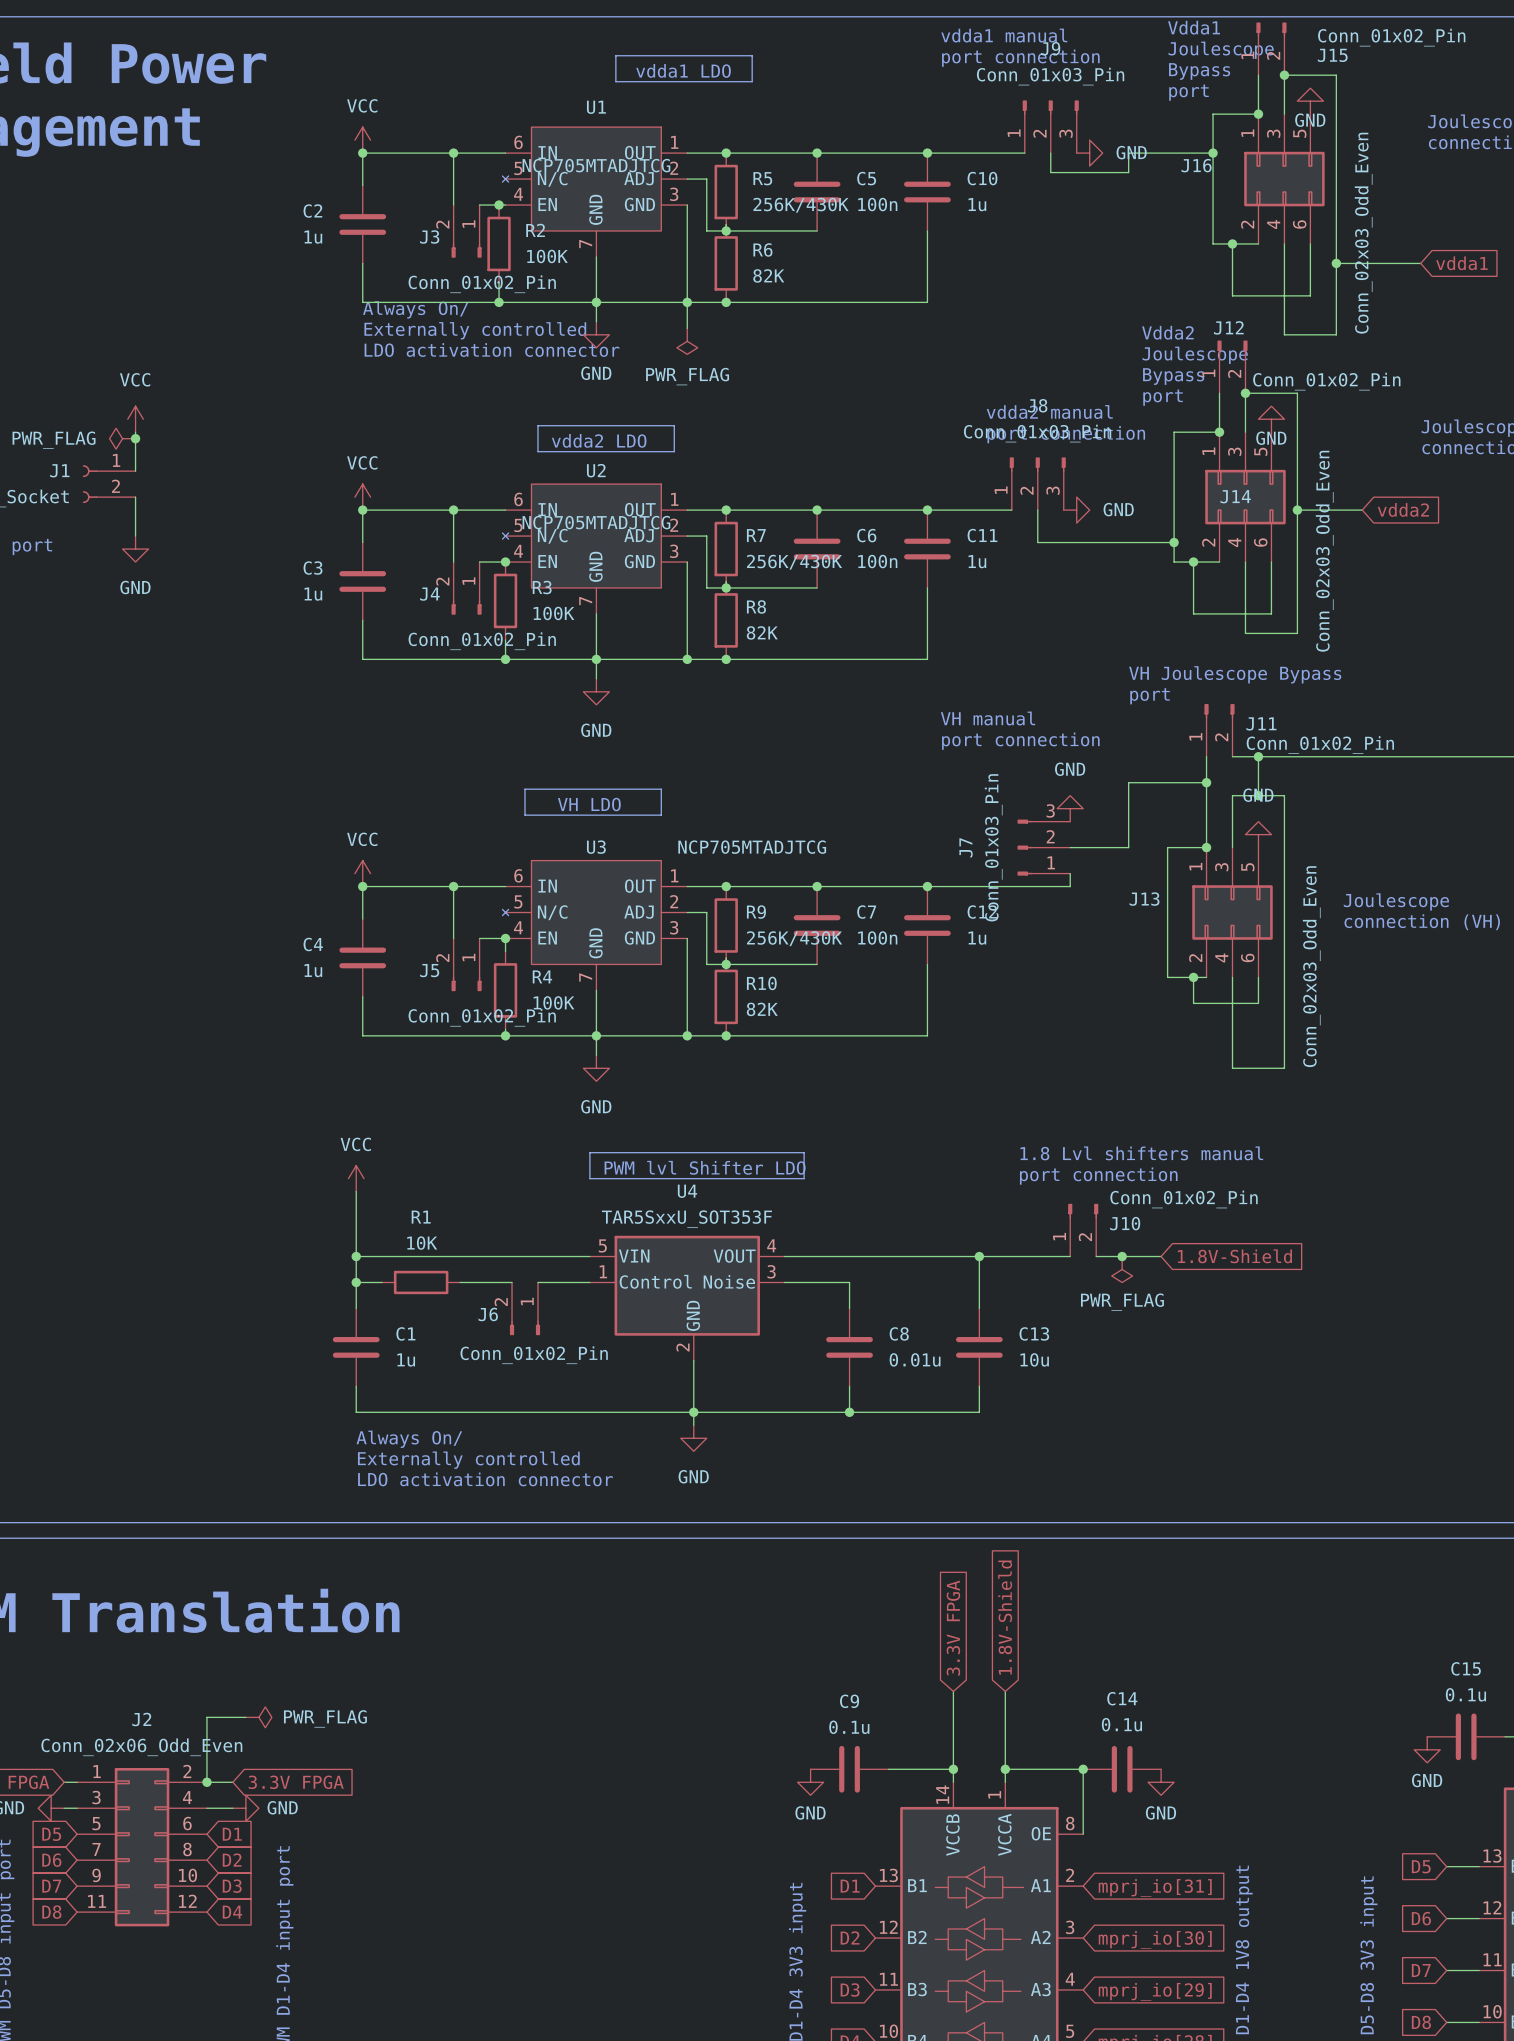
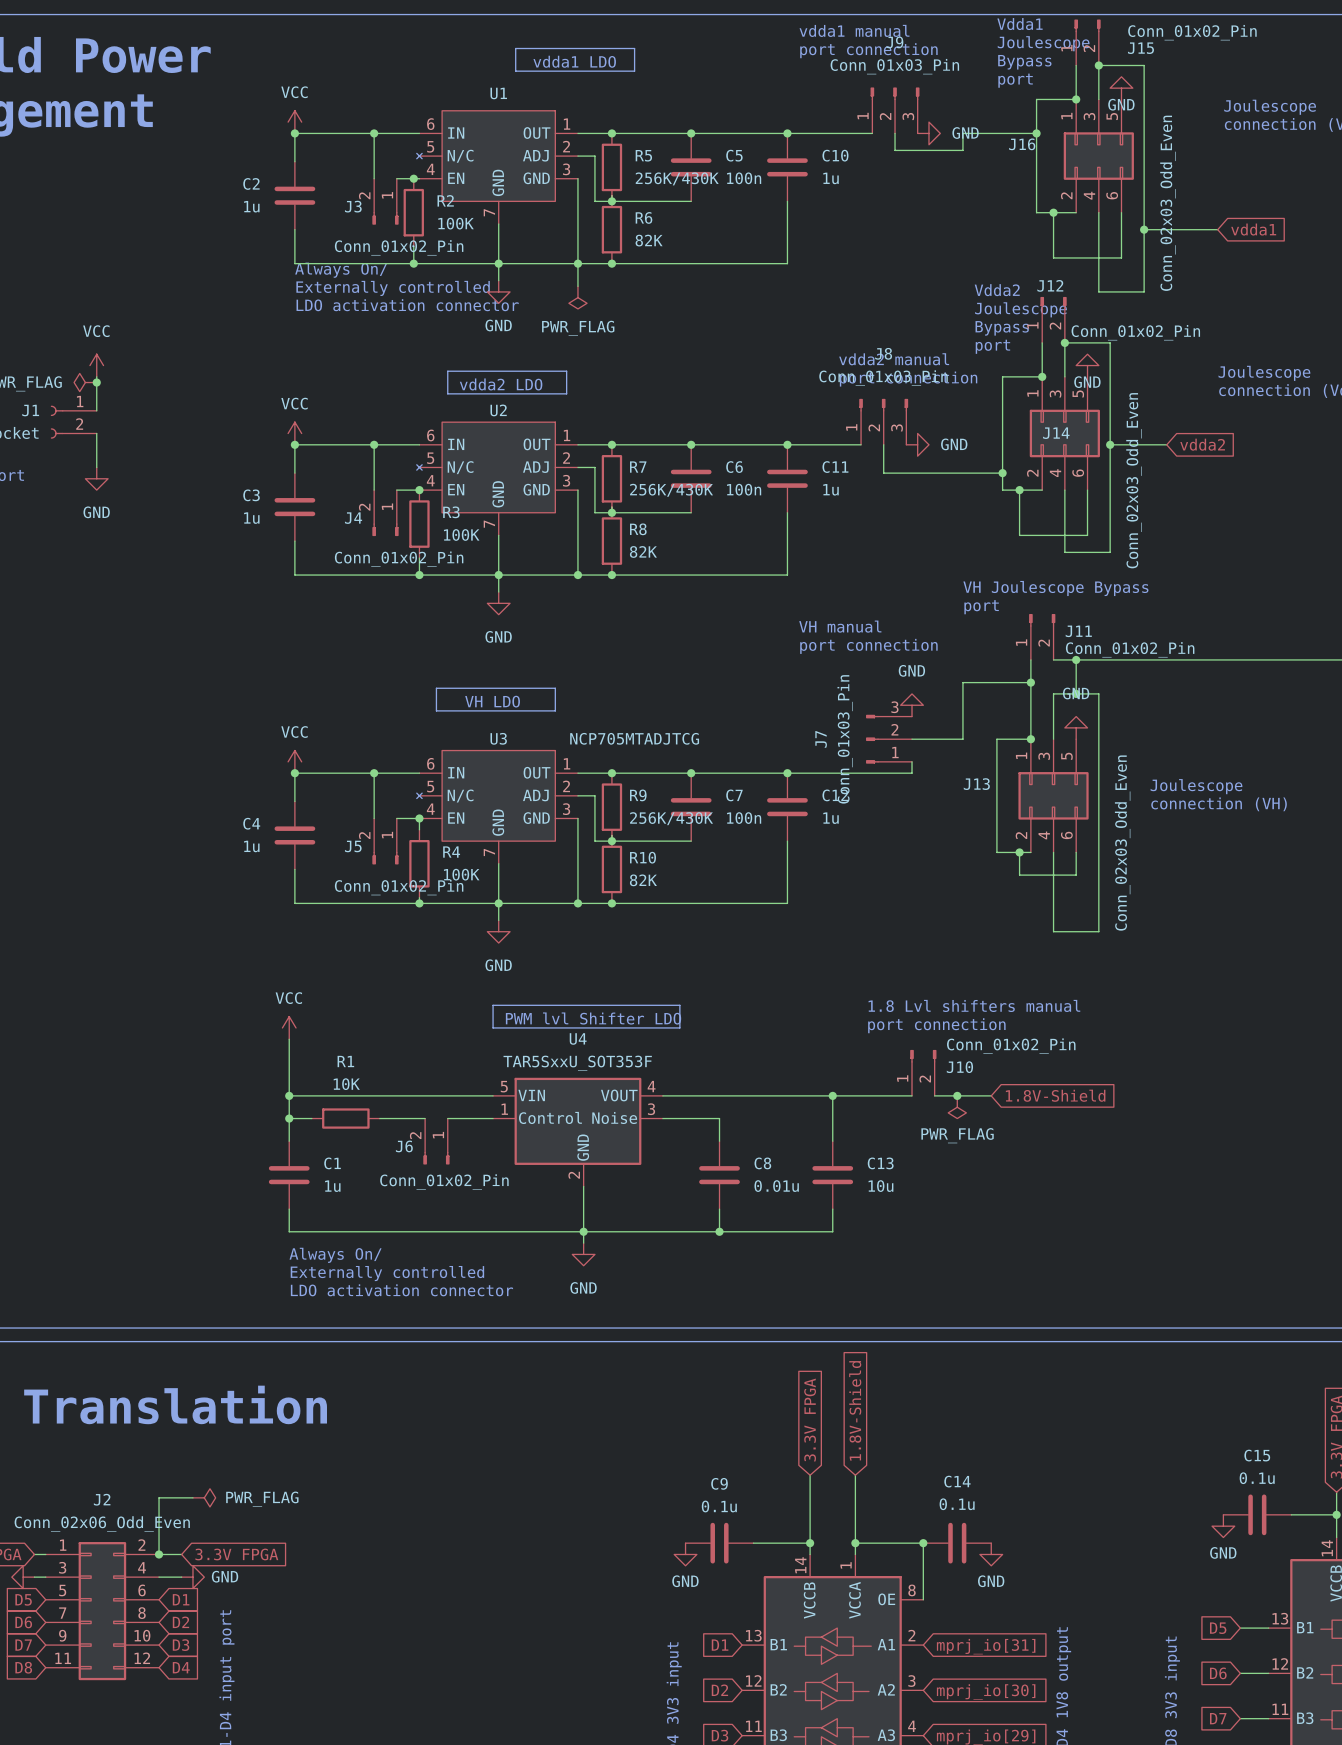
U1 value: NCP705MTADJTCG (596, 165) -> none
U2 value: NCP705MTADJTCG (596, 522) -> none

